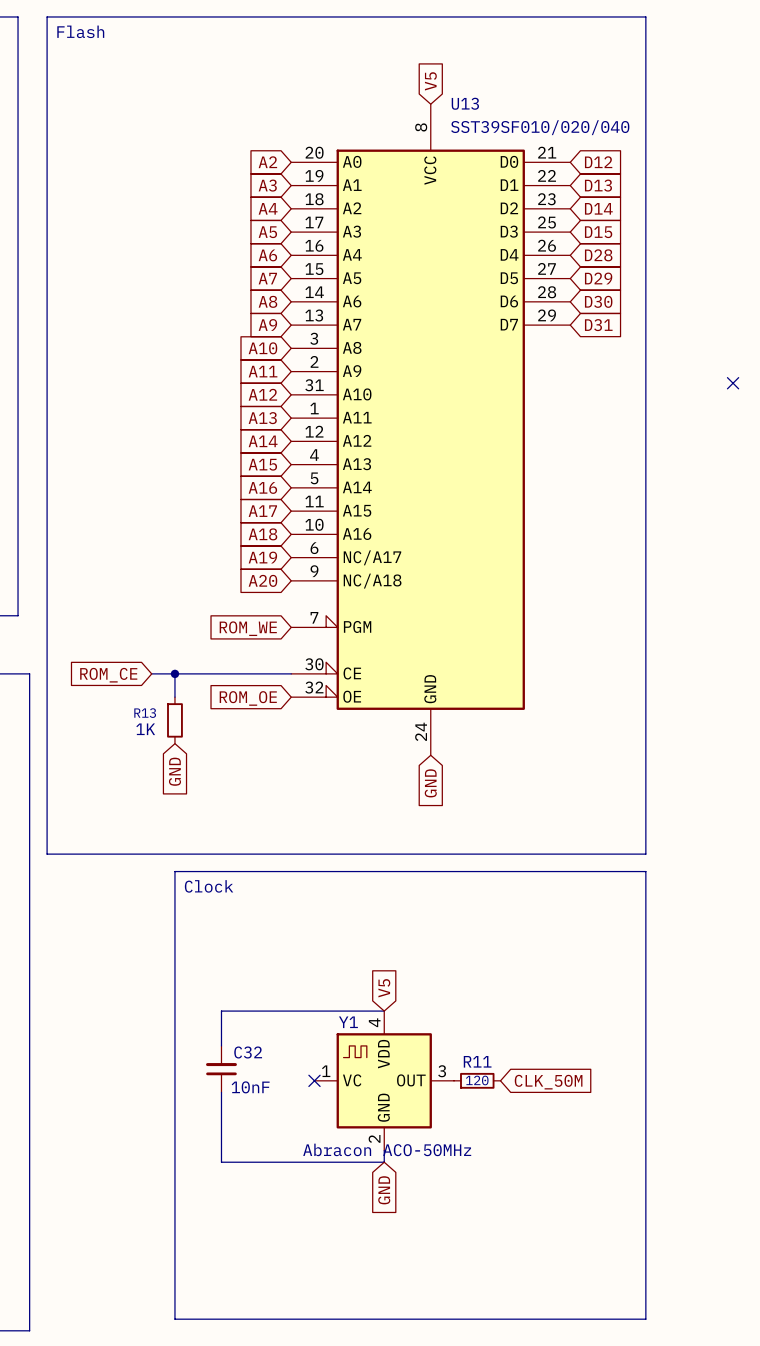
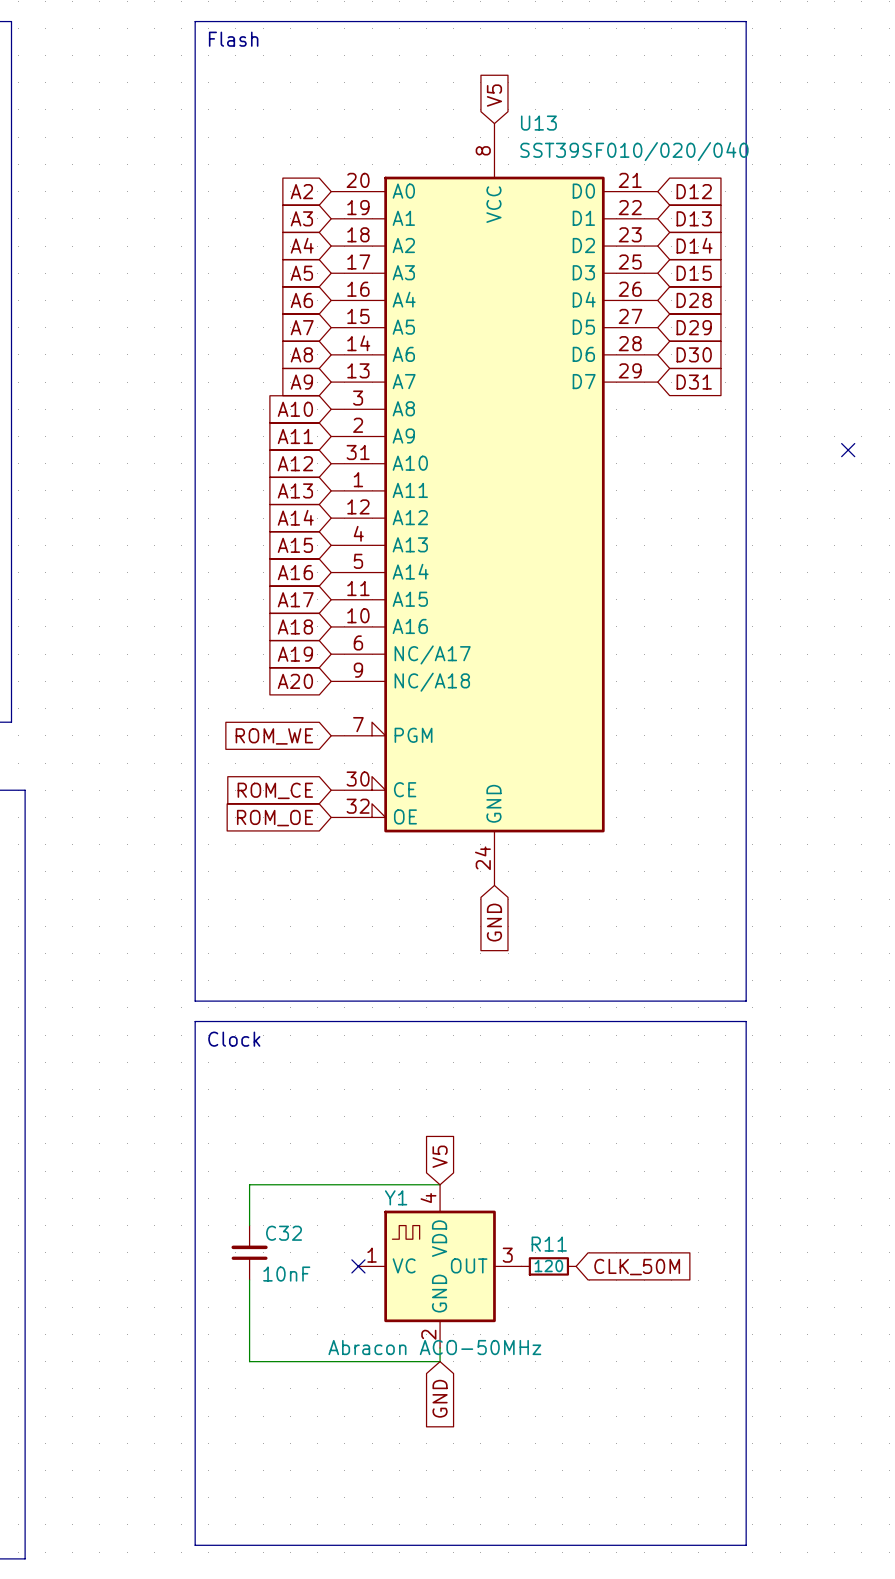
line: (174, 16) (47, 16) (47, 854) (174, 854) -> (195, 21) (195, 1001)
text position: Flash (80, 31) -> Flash (233, 39)
wire: (151, 673) (291, 673) -> none
junction: (174, 673) -> none
global label position: ROM_CE (108, 675) -> ROM_CE (275, 790)
R13: 1K (174, 720) -> none
global label: GND (174, 771) -> none

